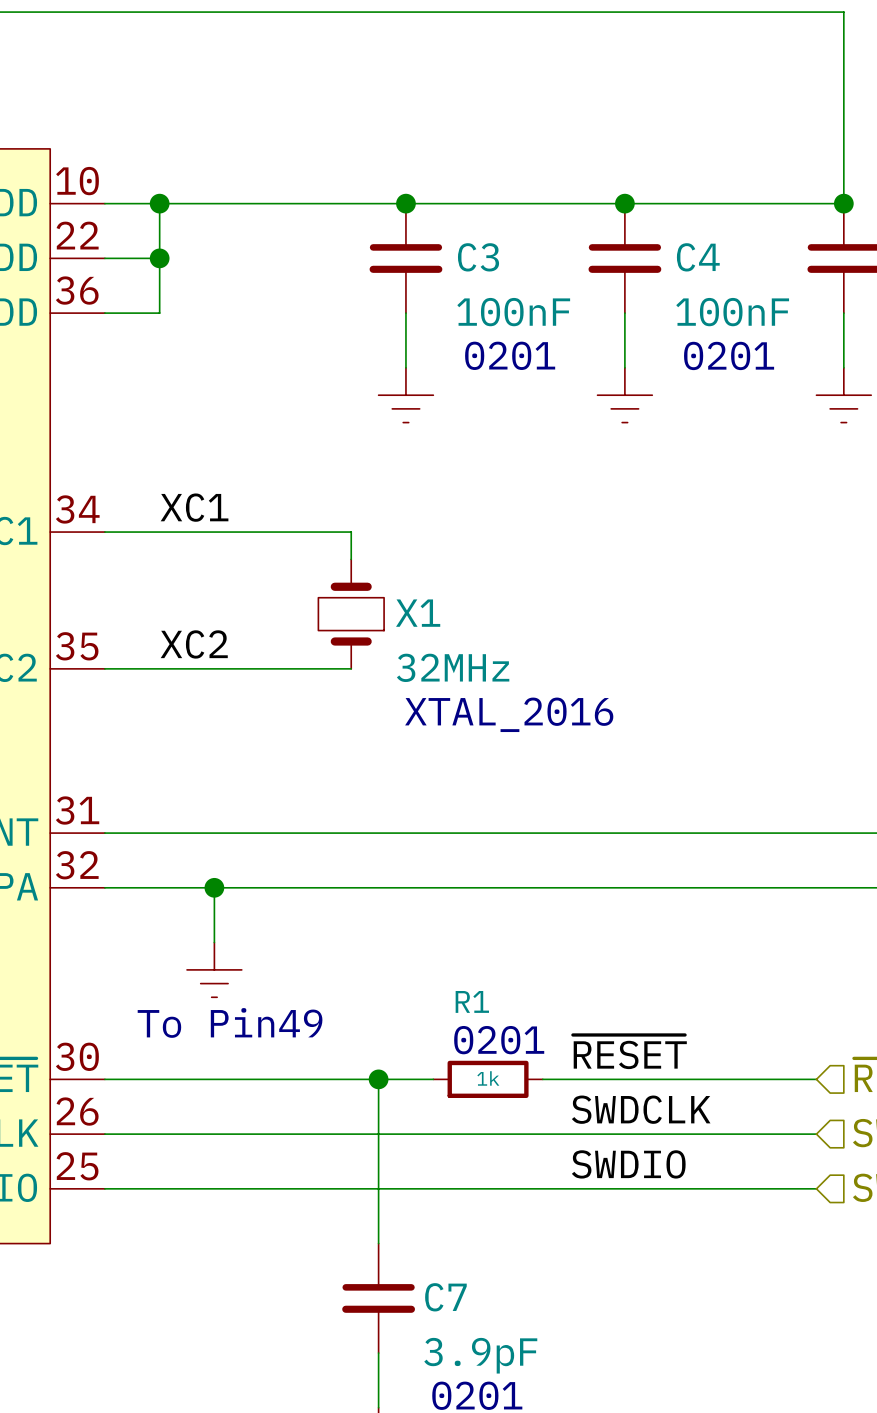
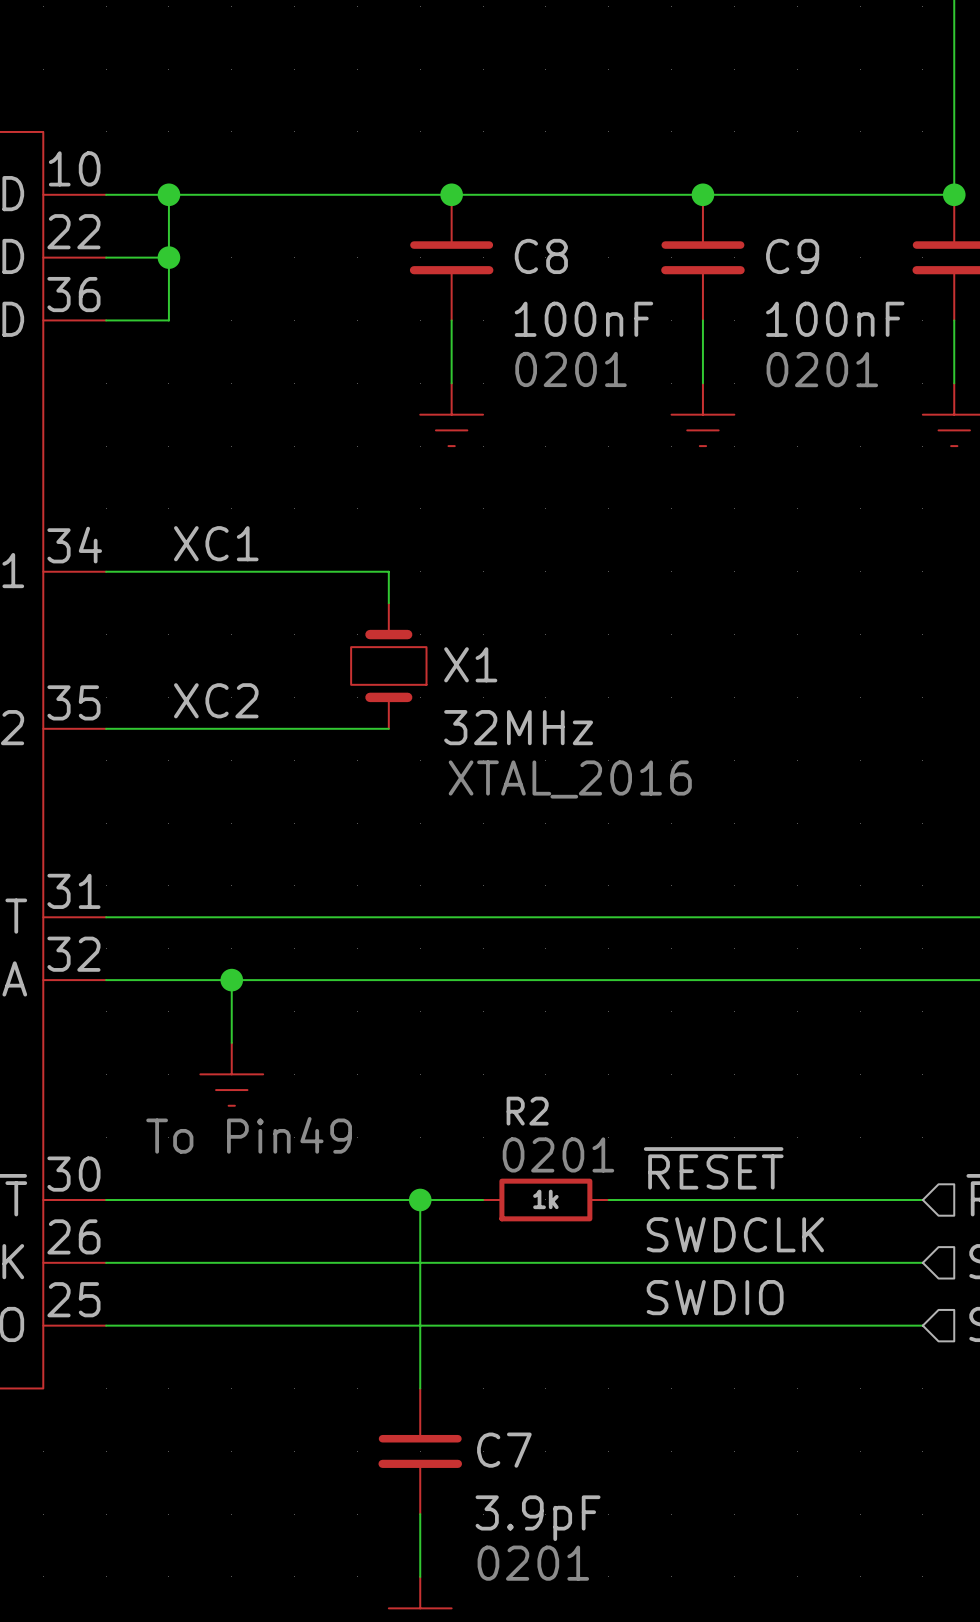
C3 name: C3 (478, 257) -> C8 (541, 256)
C4 name: C4 (698, 257) -> C9 (792, 256)
R1 name: R1 (472, 1001) -> R2 (527, 1111)

